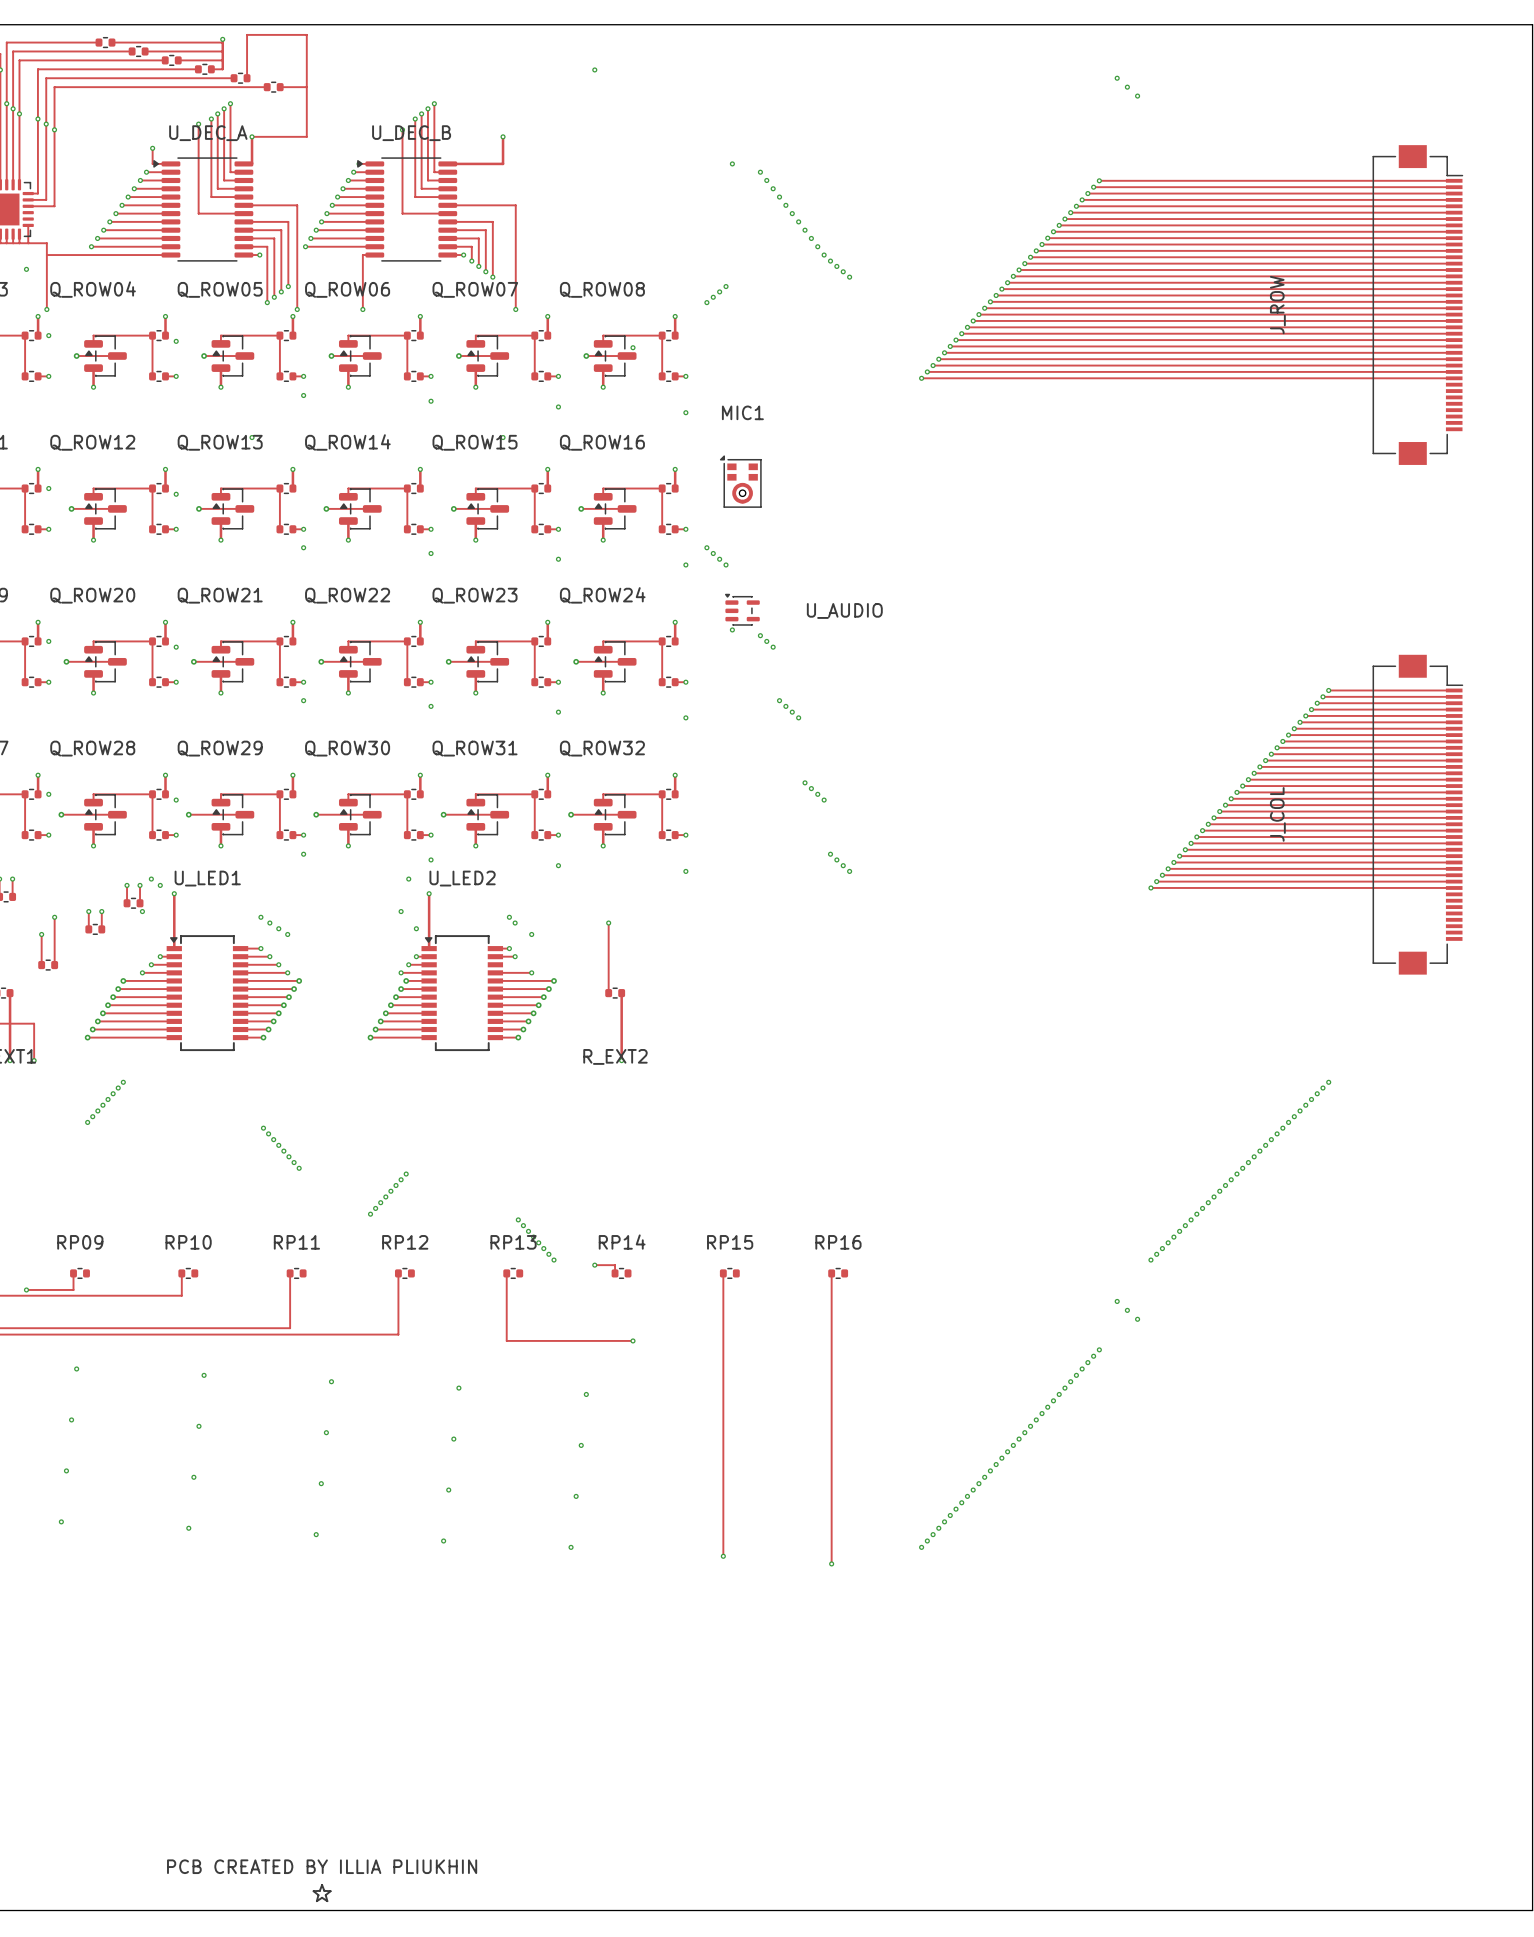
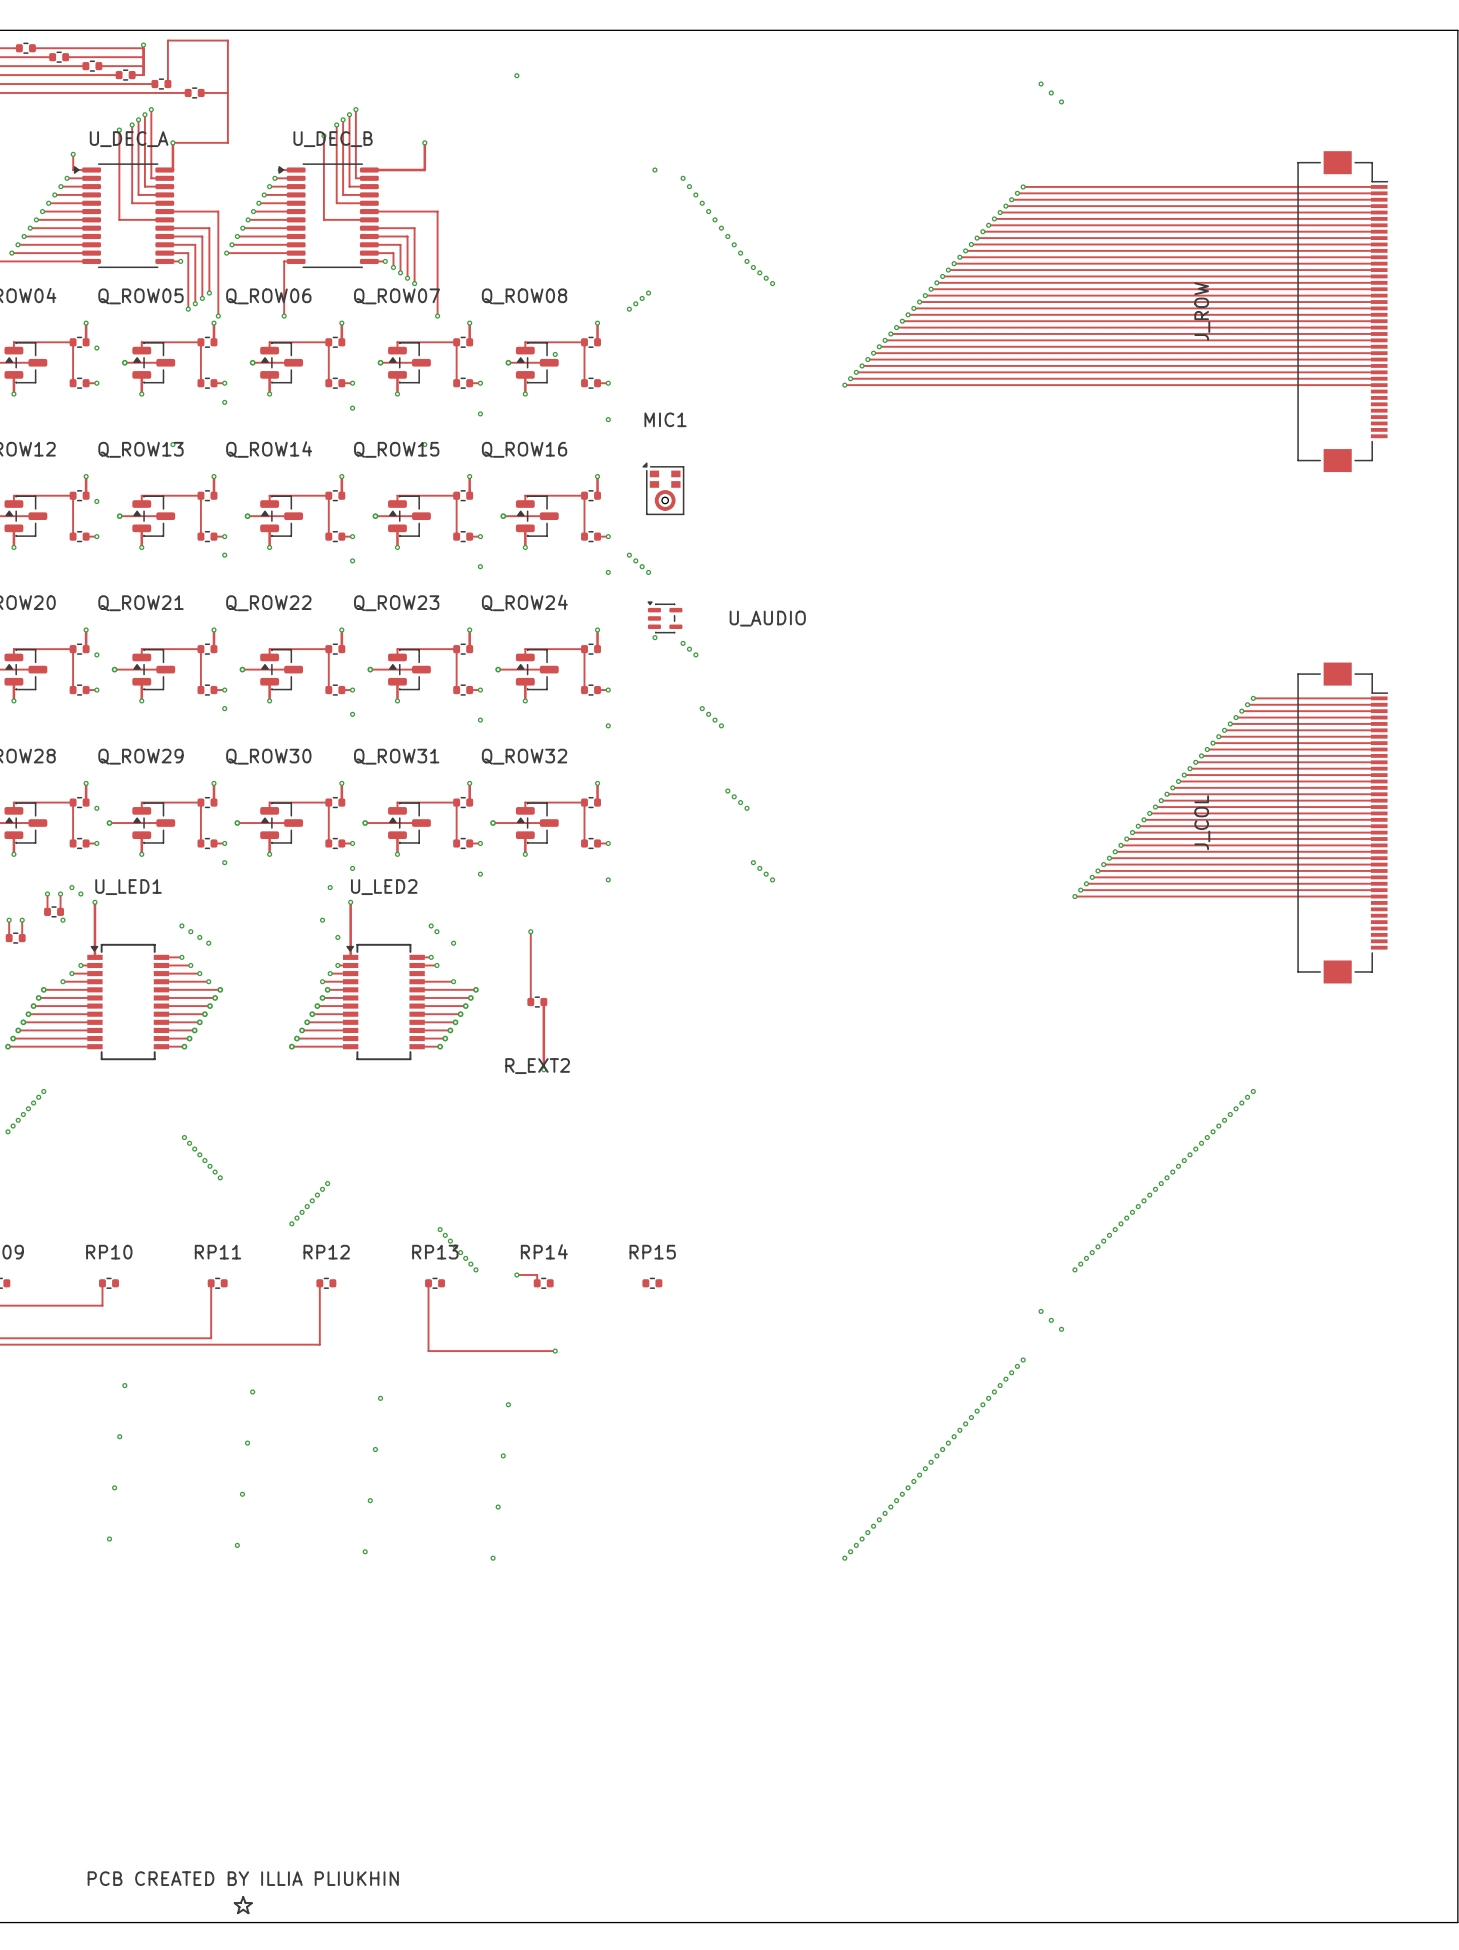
track: (723, 1273) (723, 1556) -> none
track: (831, 1273) (831, 1563) -> none
RP16: (838, 1273) -> none
via: (723, 1556) -> none
via: (831, 1563) -> none

